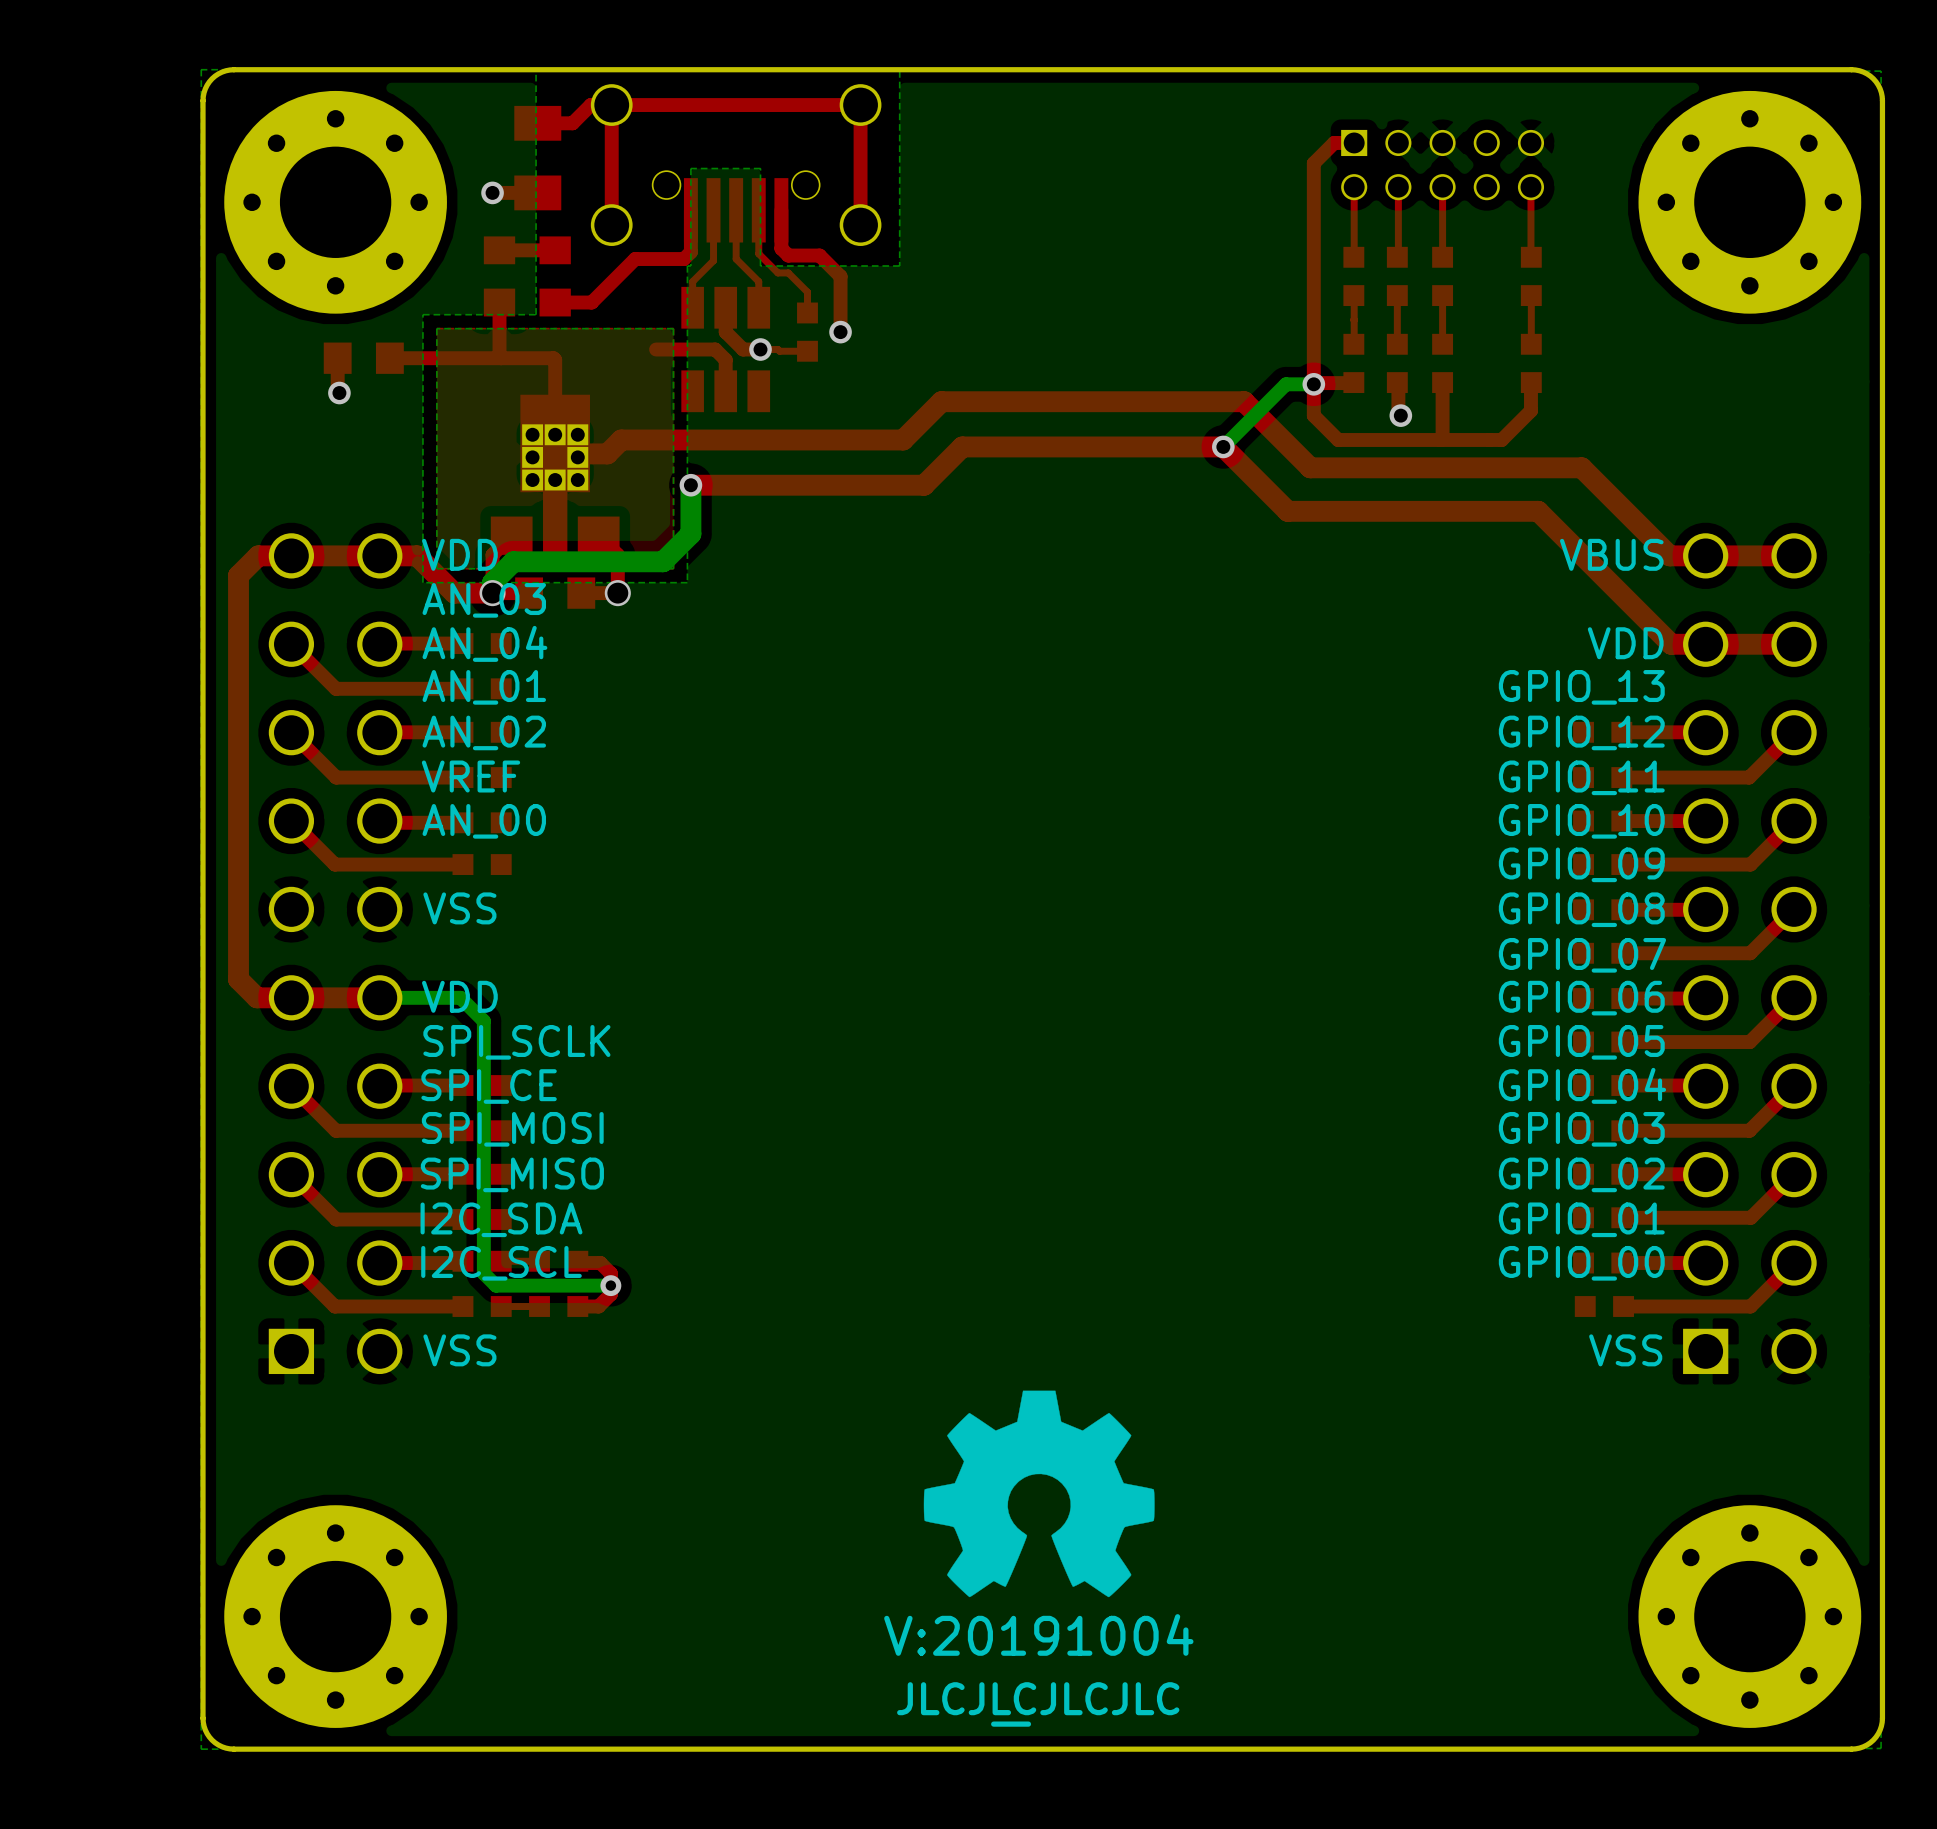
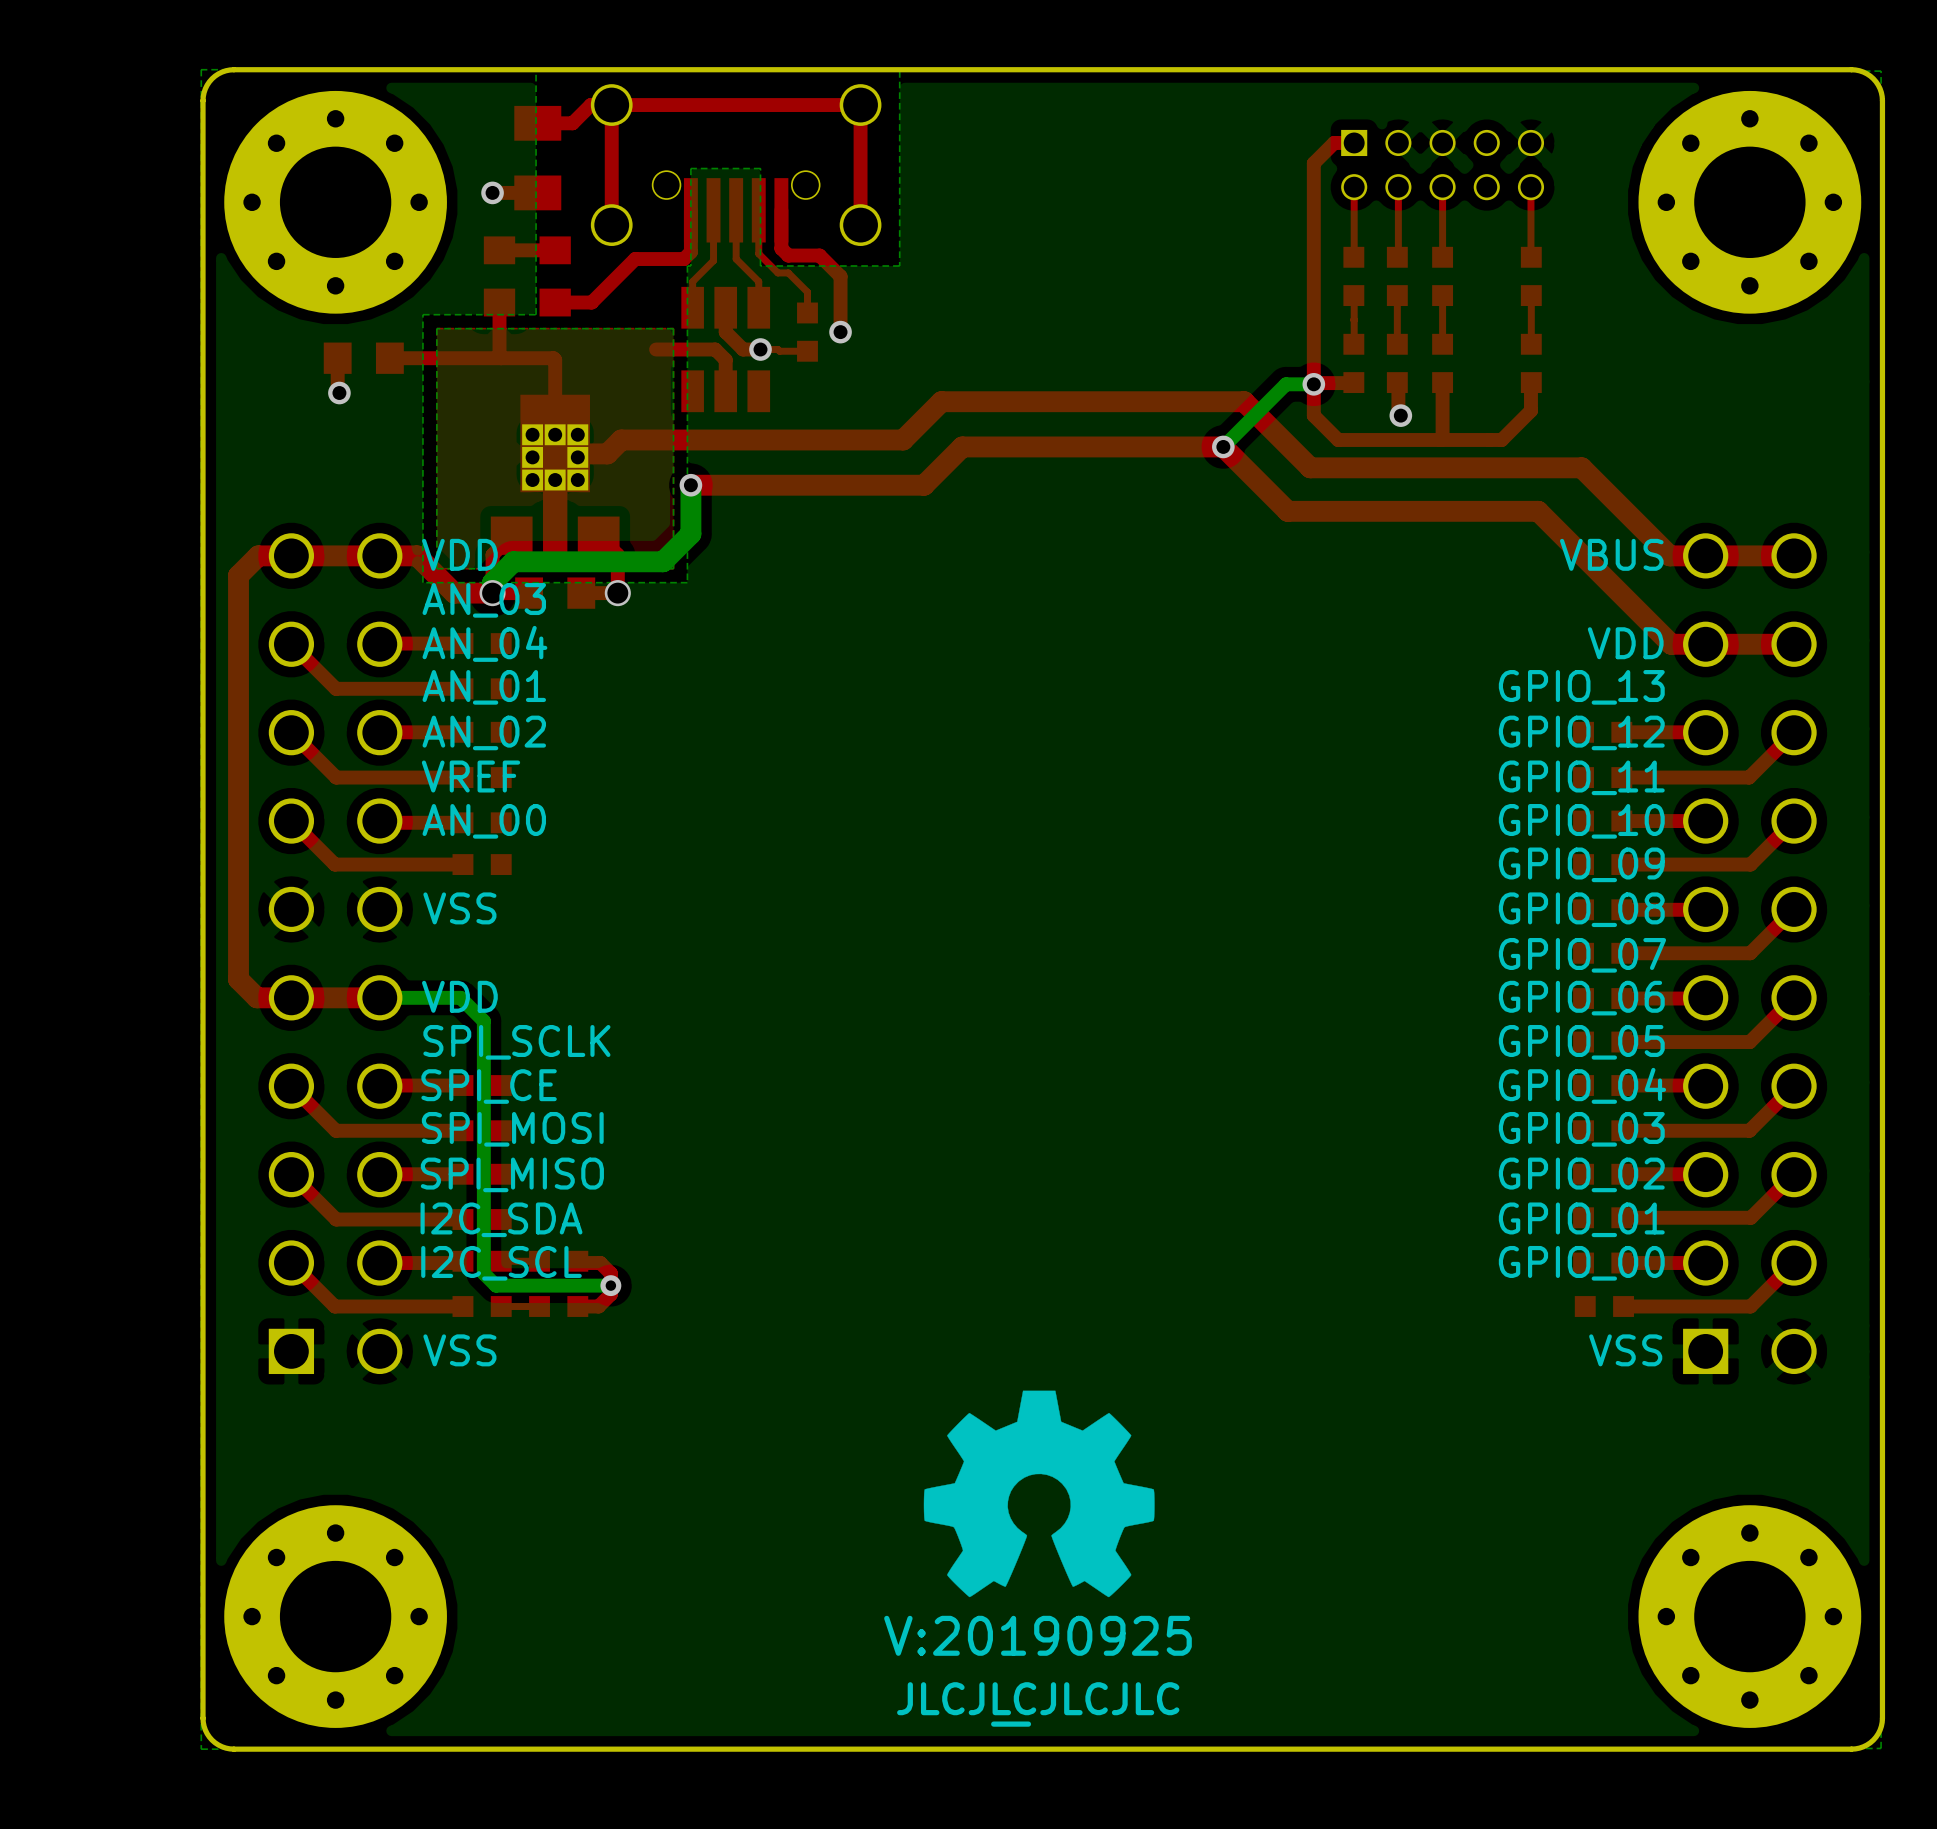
drawing shape: [884, 1614, 1194, 1656] -> [884, 1615, 1192, 1656]

